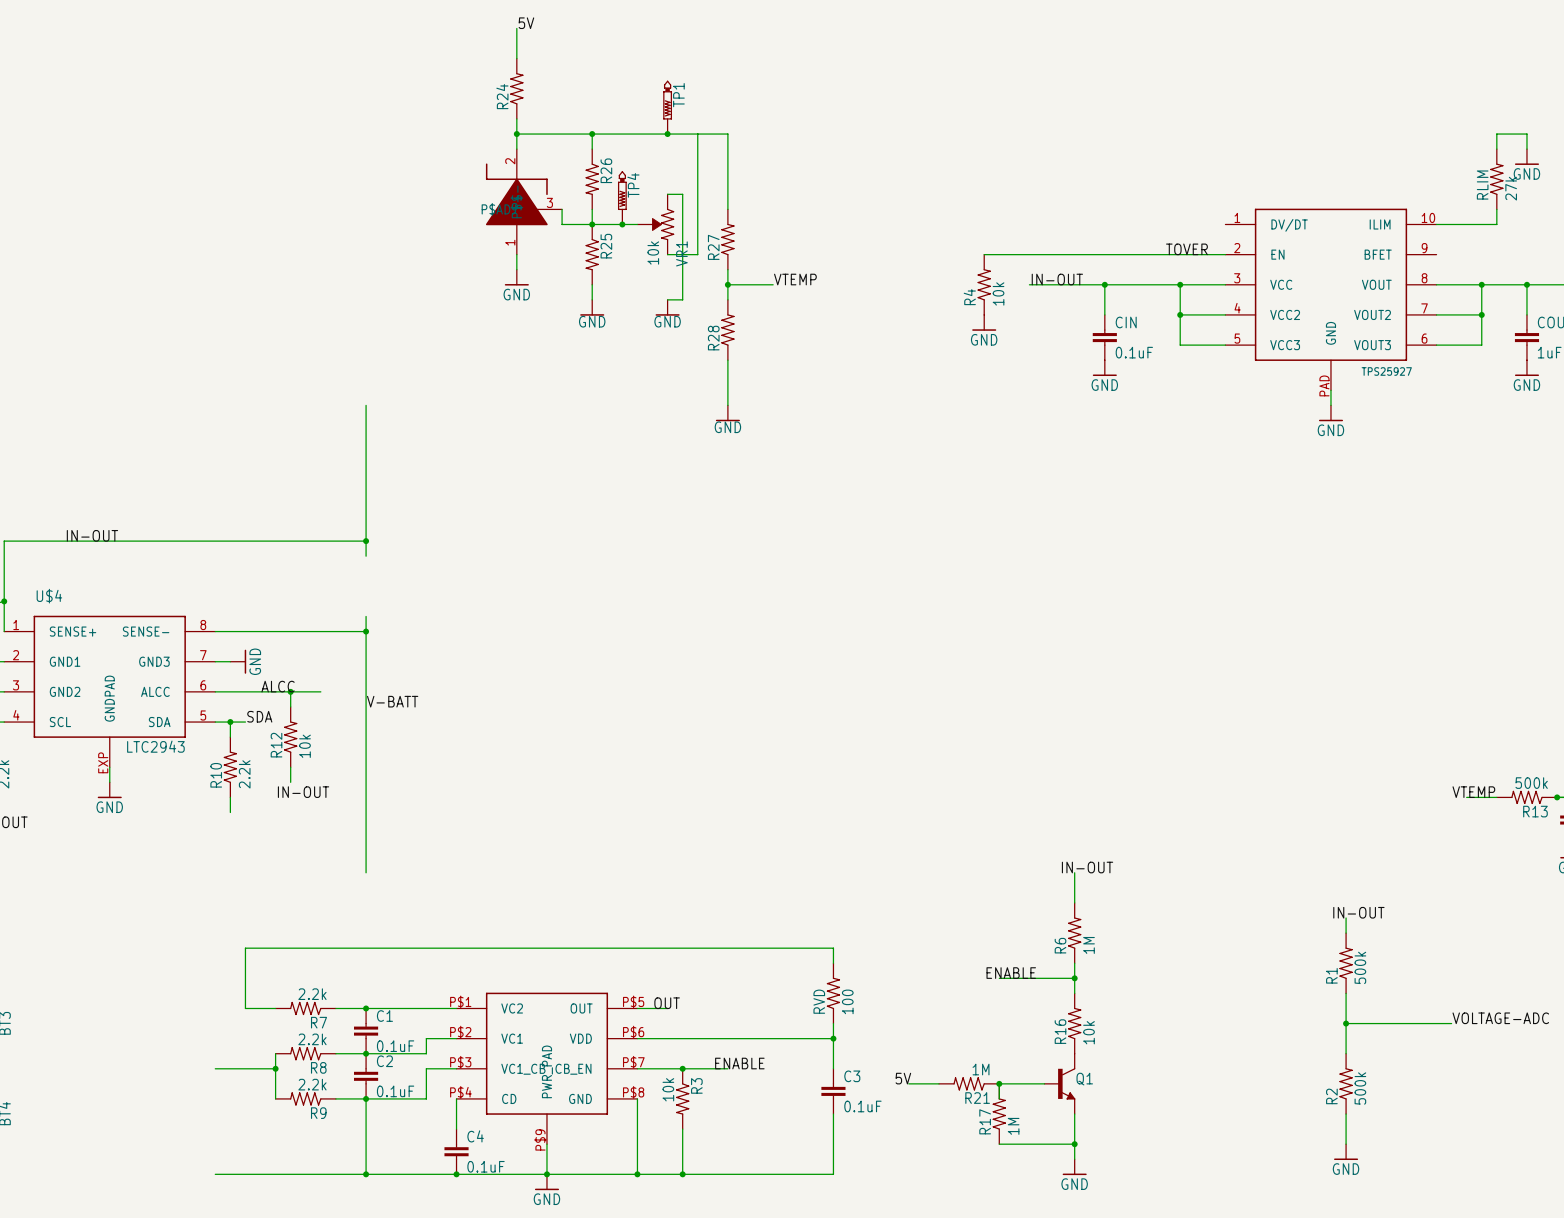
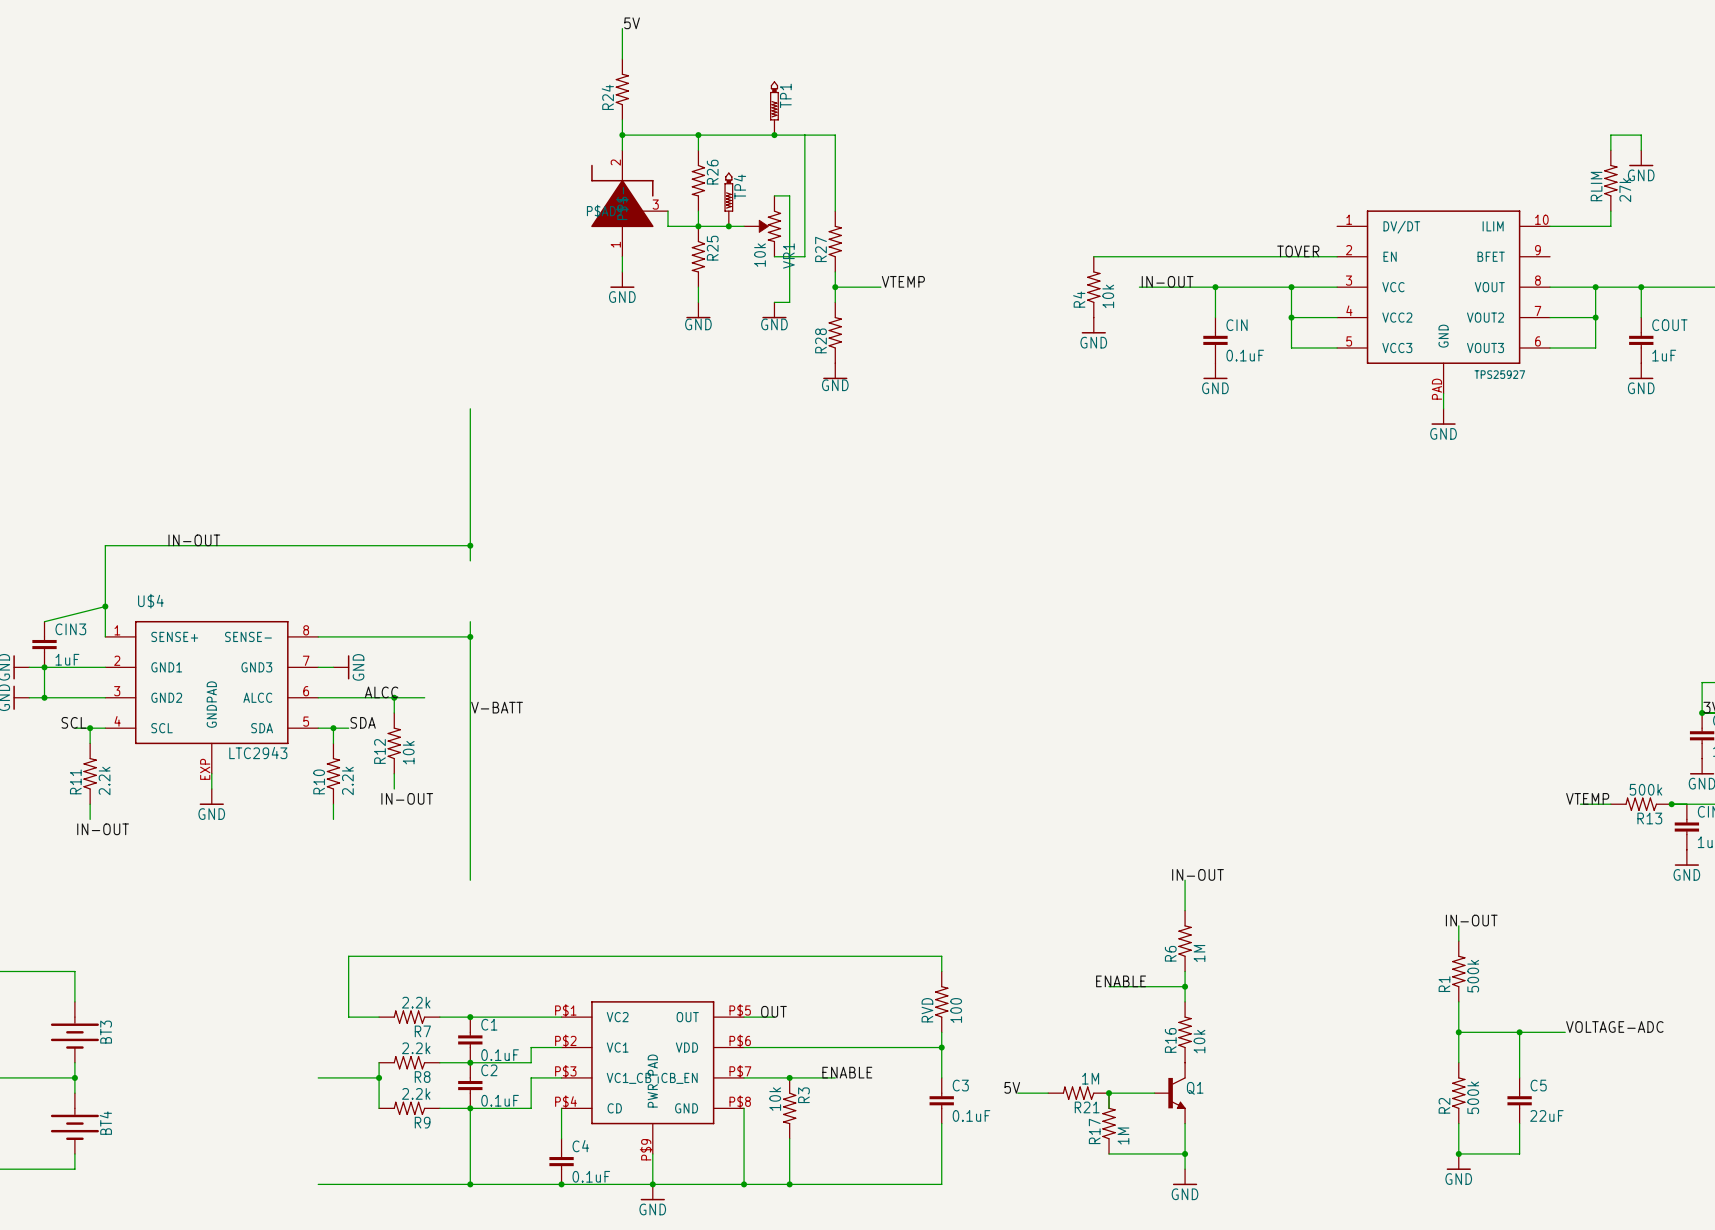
wire: (727, 360) (727, 405) -> none
power symbol position: GND (727, 413) -> GND (835, 371)
wire: none -> (1519, 1032) (1519, 1077)
junction: none -> (1519, 1032)
C5: none -> 22uF (1519, 1100)
wire: none -> (1519, 1123) (1519, 1153) (1458, 1153)
junction: none -> (1458, 1153)

